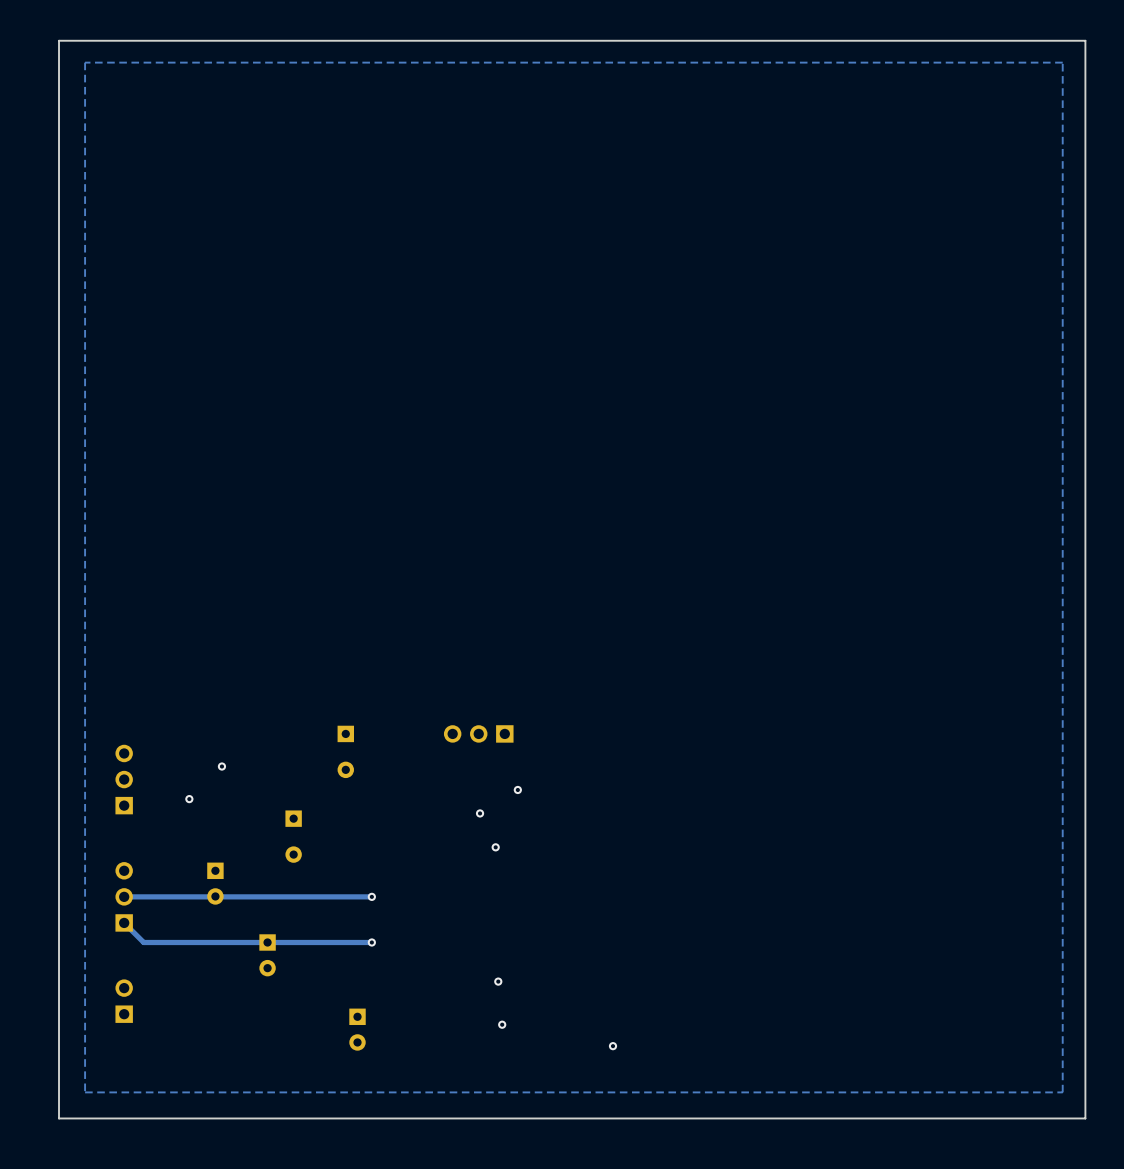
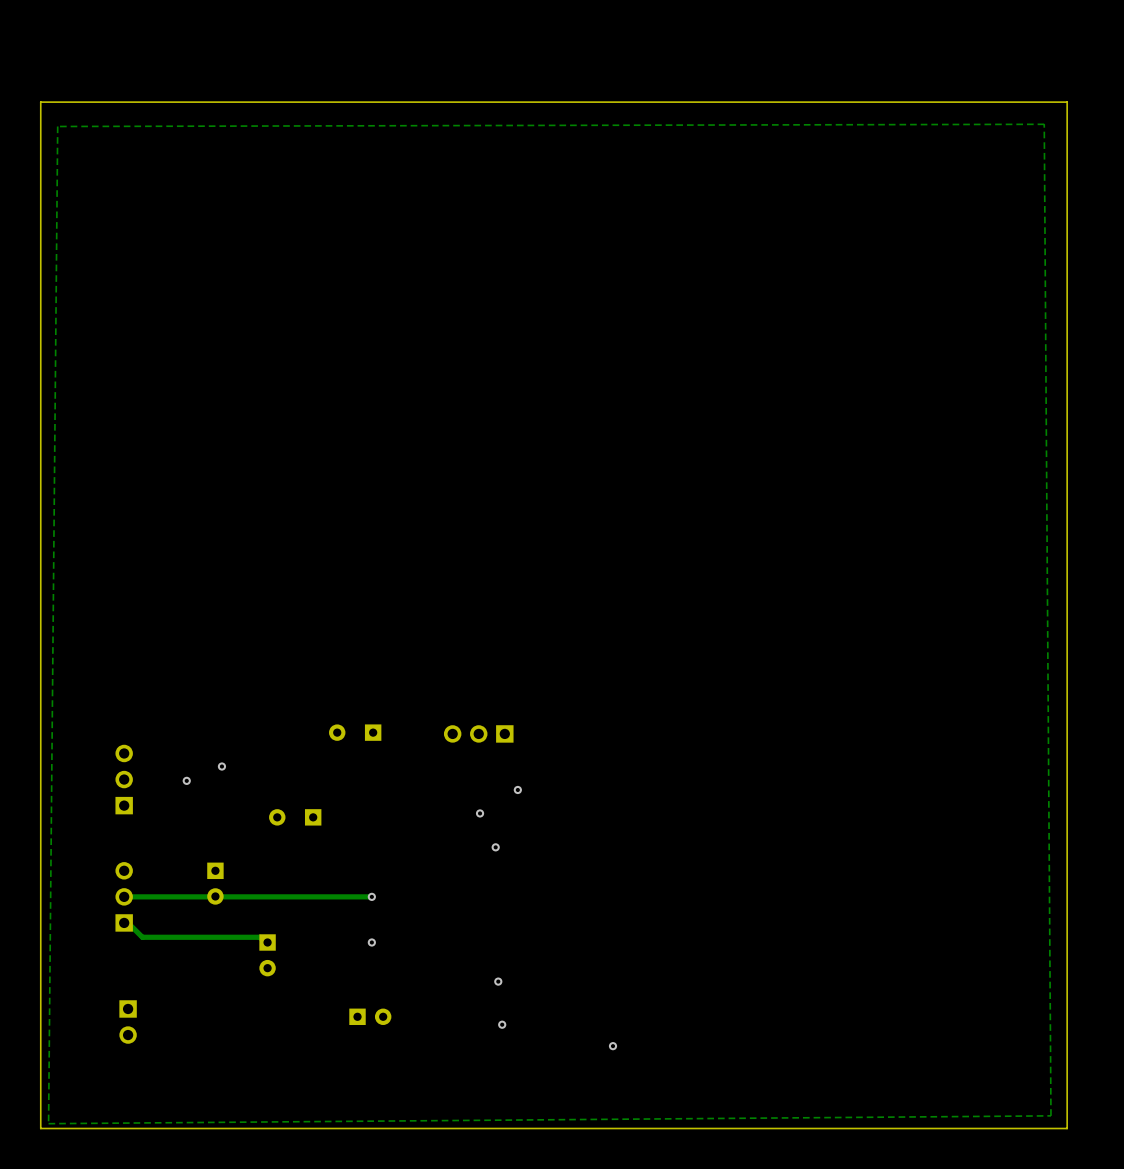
board edge: (1085, 40) (59, 40) (59, 1118) (1085, 1118) (1085, 40) -> (1067, 102) (1067, 1128) (40, 1128) (40, 102) (1067, 102)
zone outline: (1062, 62) (1062, 1092) (85, 1092) (85, 62) (1062, 62) -> (1044, 124) (1050, 1115) (48, 1123) (57, 126) (1044, 124)
part rotation: 0° (345, 751) -> 90° clockwise (355, 732)
via position: (189, 799) -> (186, 780)
part rotation: 0° (293, 836) -> 90° clockwise (295, 817)
track: none -> (125, 920) (142, 937) (259, 937) (264, 942) (267, 939)
track: (124, 922) (143, 942) (371, 942) -> none
part rotation: 0° (124, 1001) -> 180° (128, 1022)
part rotation: 0° (357, 1029) -> 90° counterclockwise (370, 1016)

